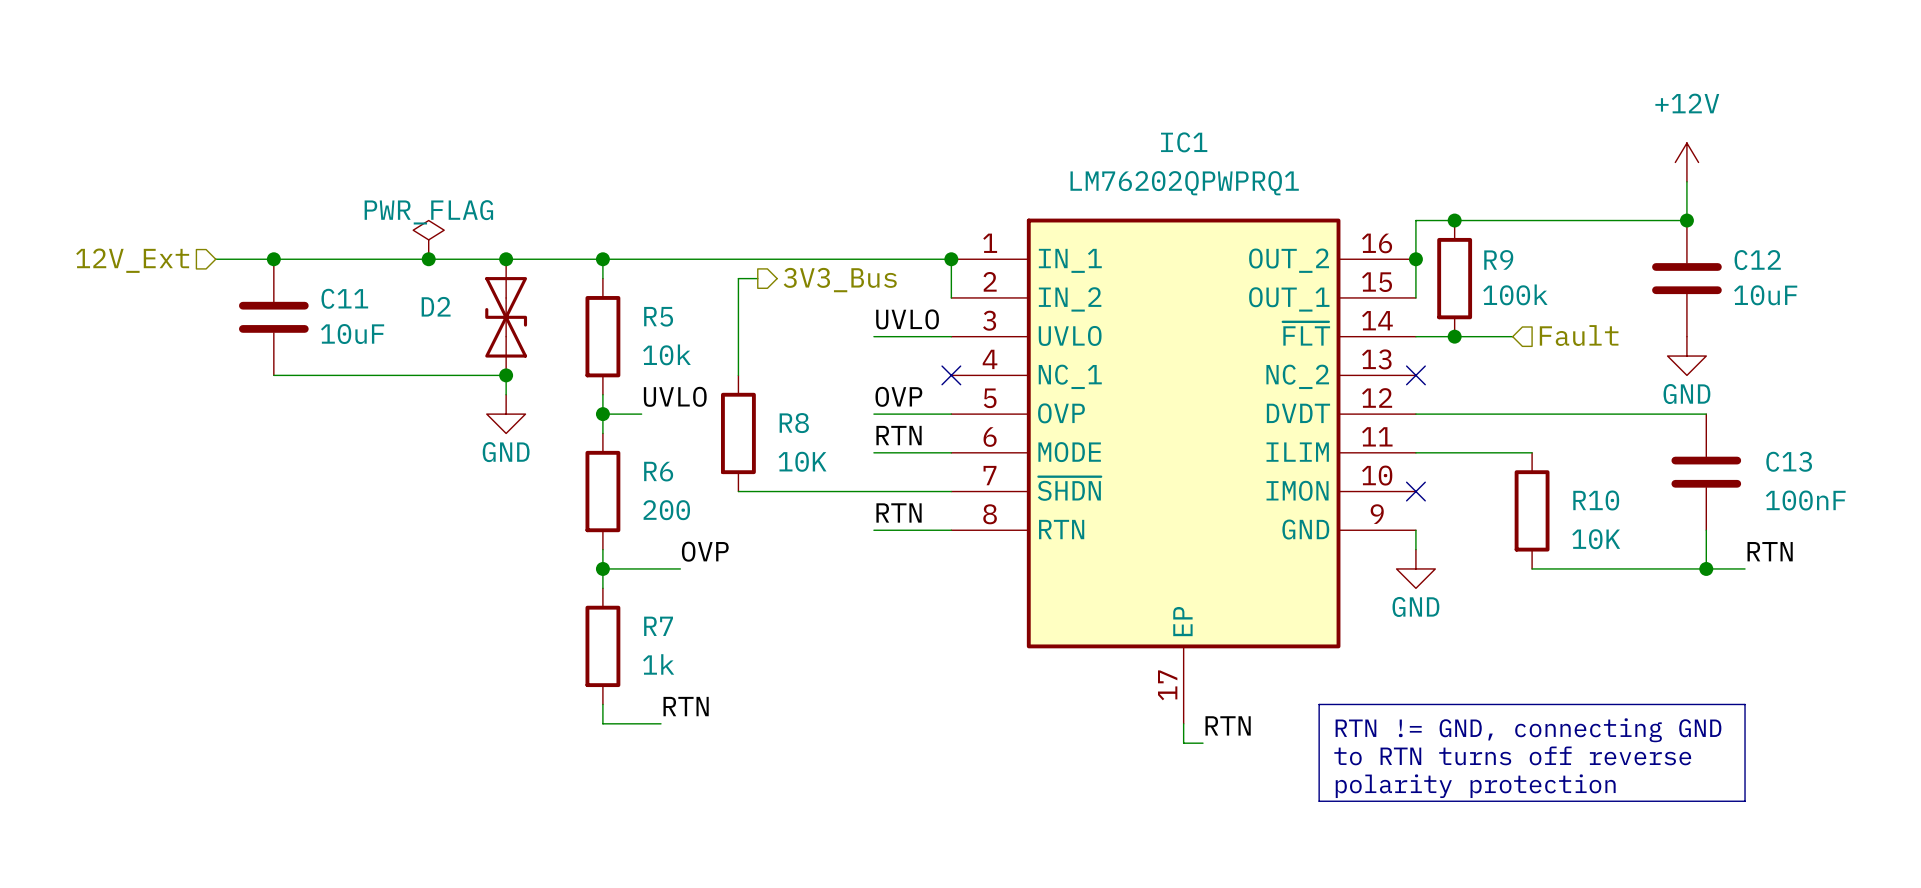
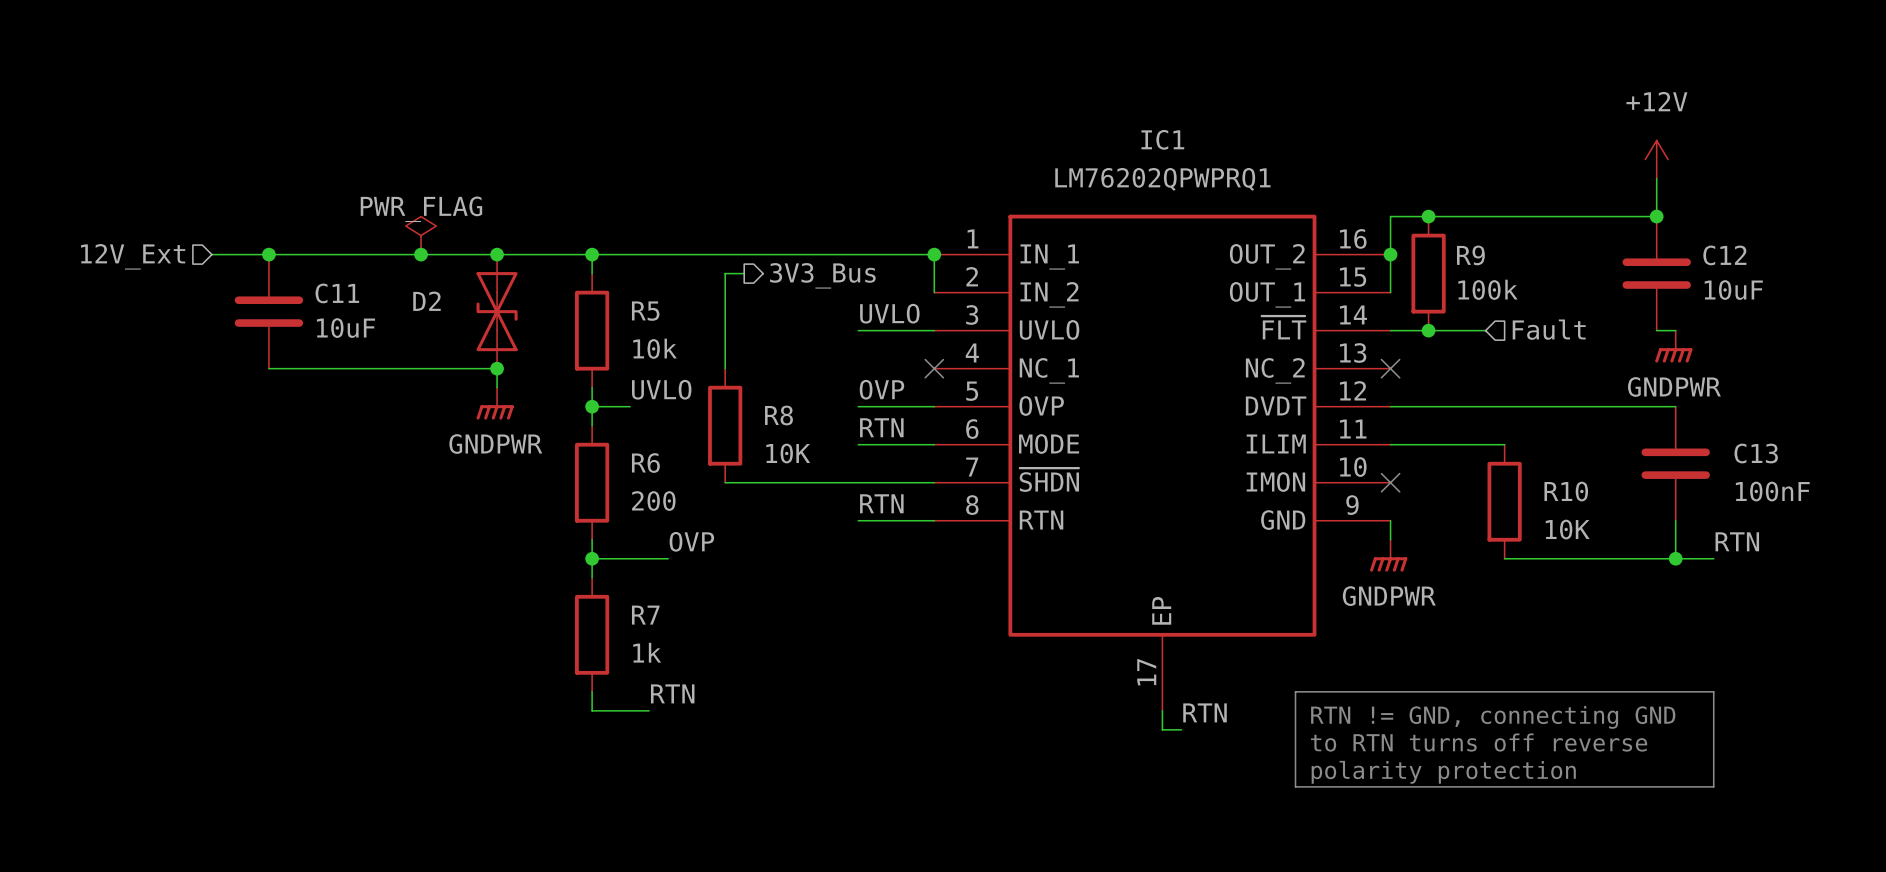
wire: none -> (1656, 330) (1675, 330)
power symbol: none -> GNDPWR (1673, 346)
power symbol: GND (1686, 356) -> none
power symbol: GND (506, 414) -> GNDPWR (495, 403)
power symbol: GND (1415, 568) -> GNDPWR (1388, 555)

